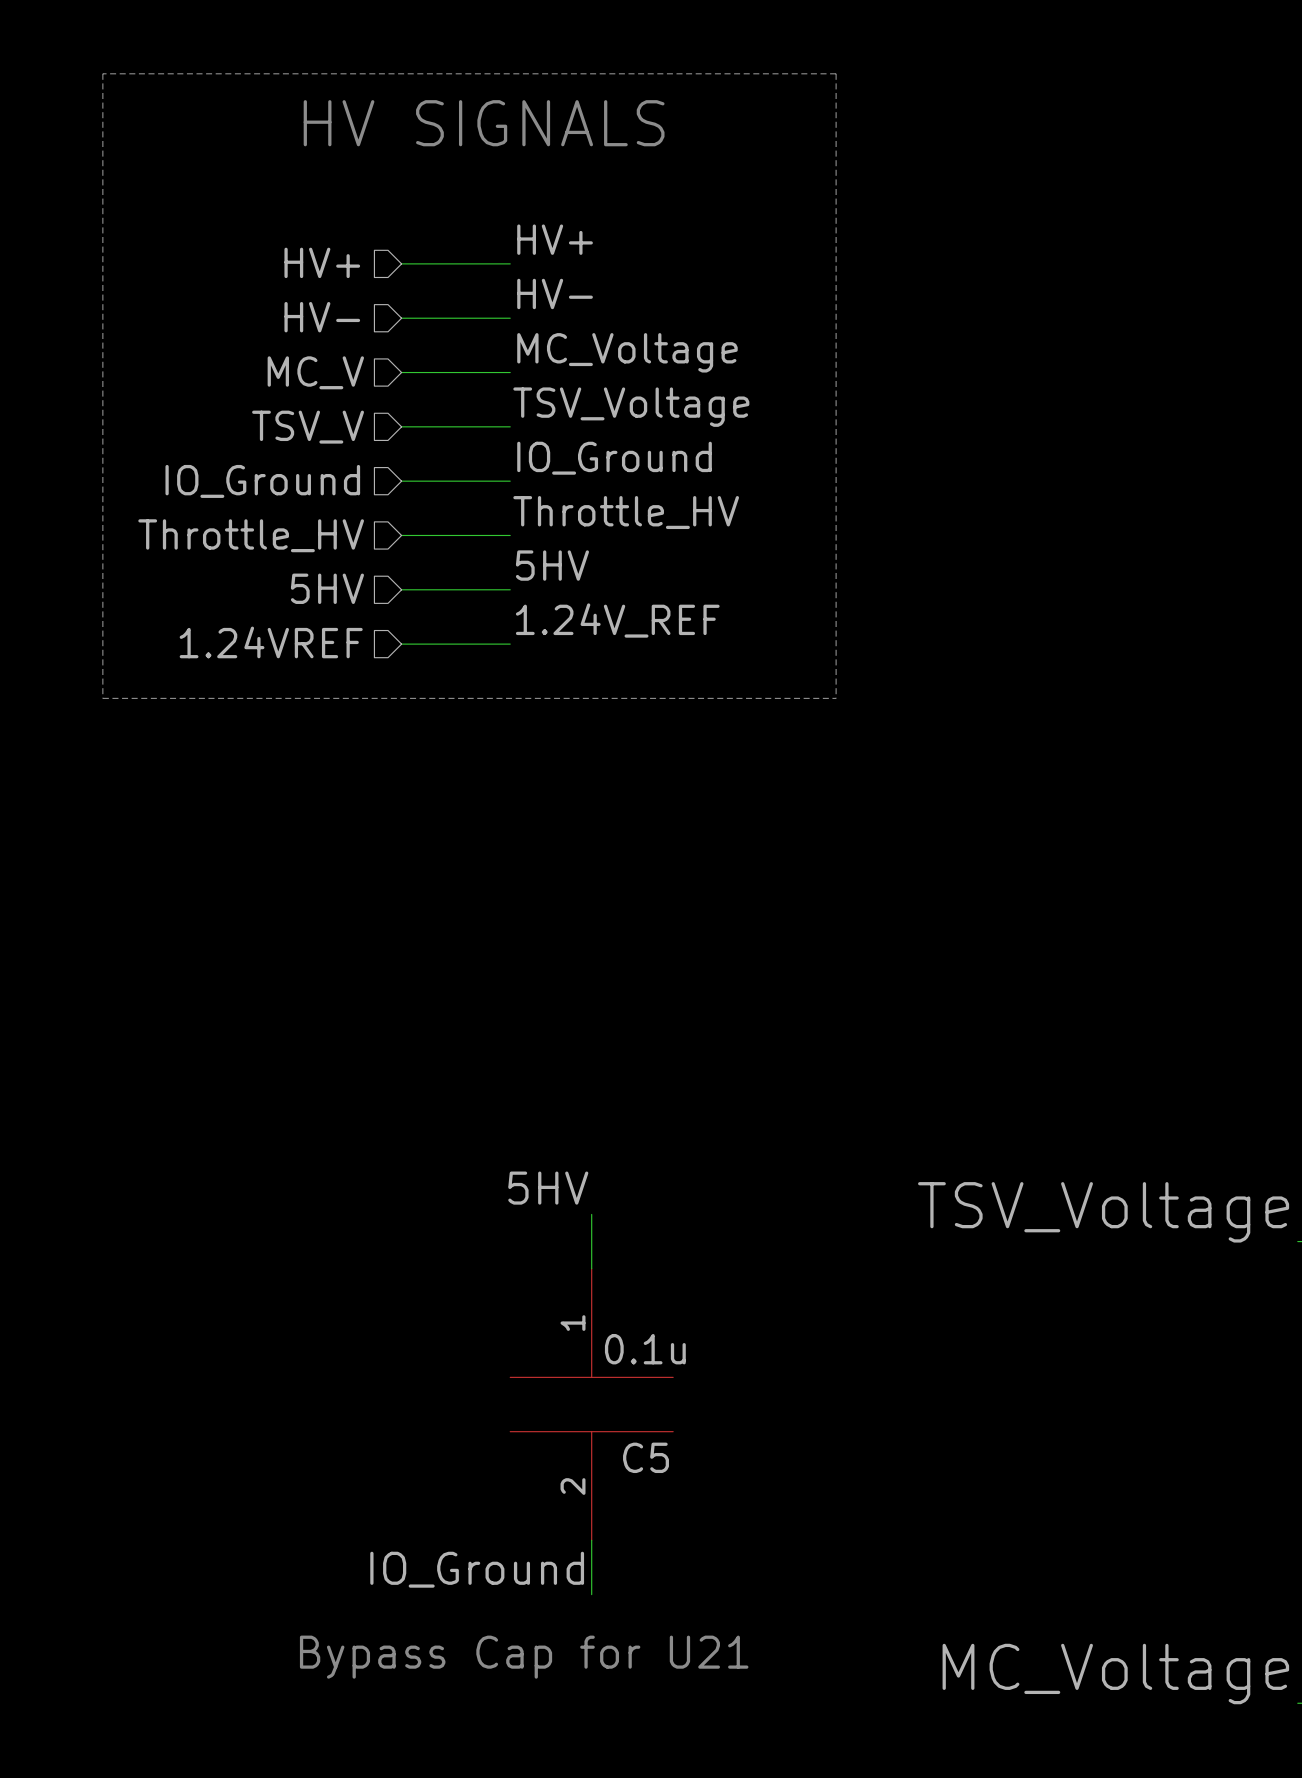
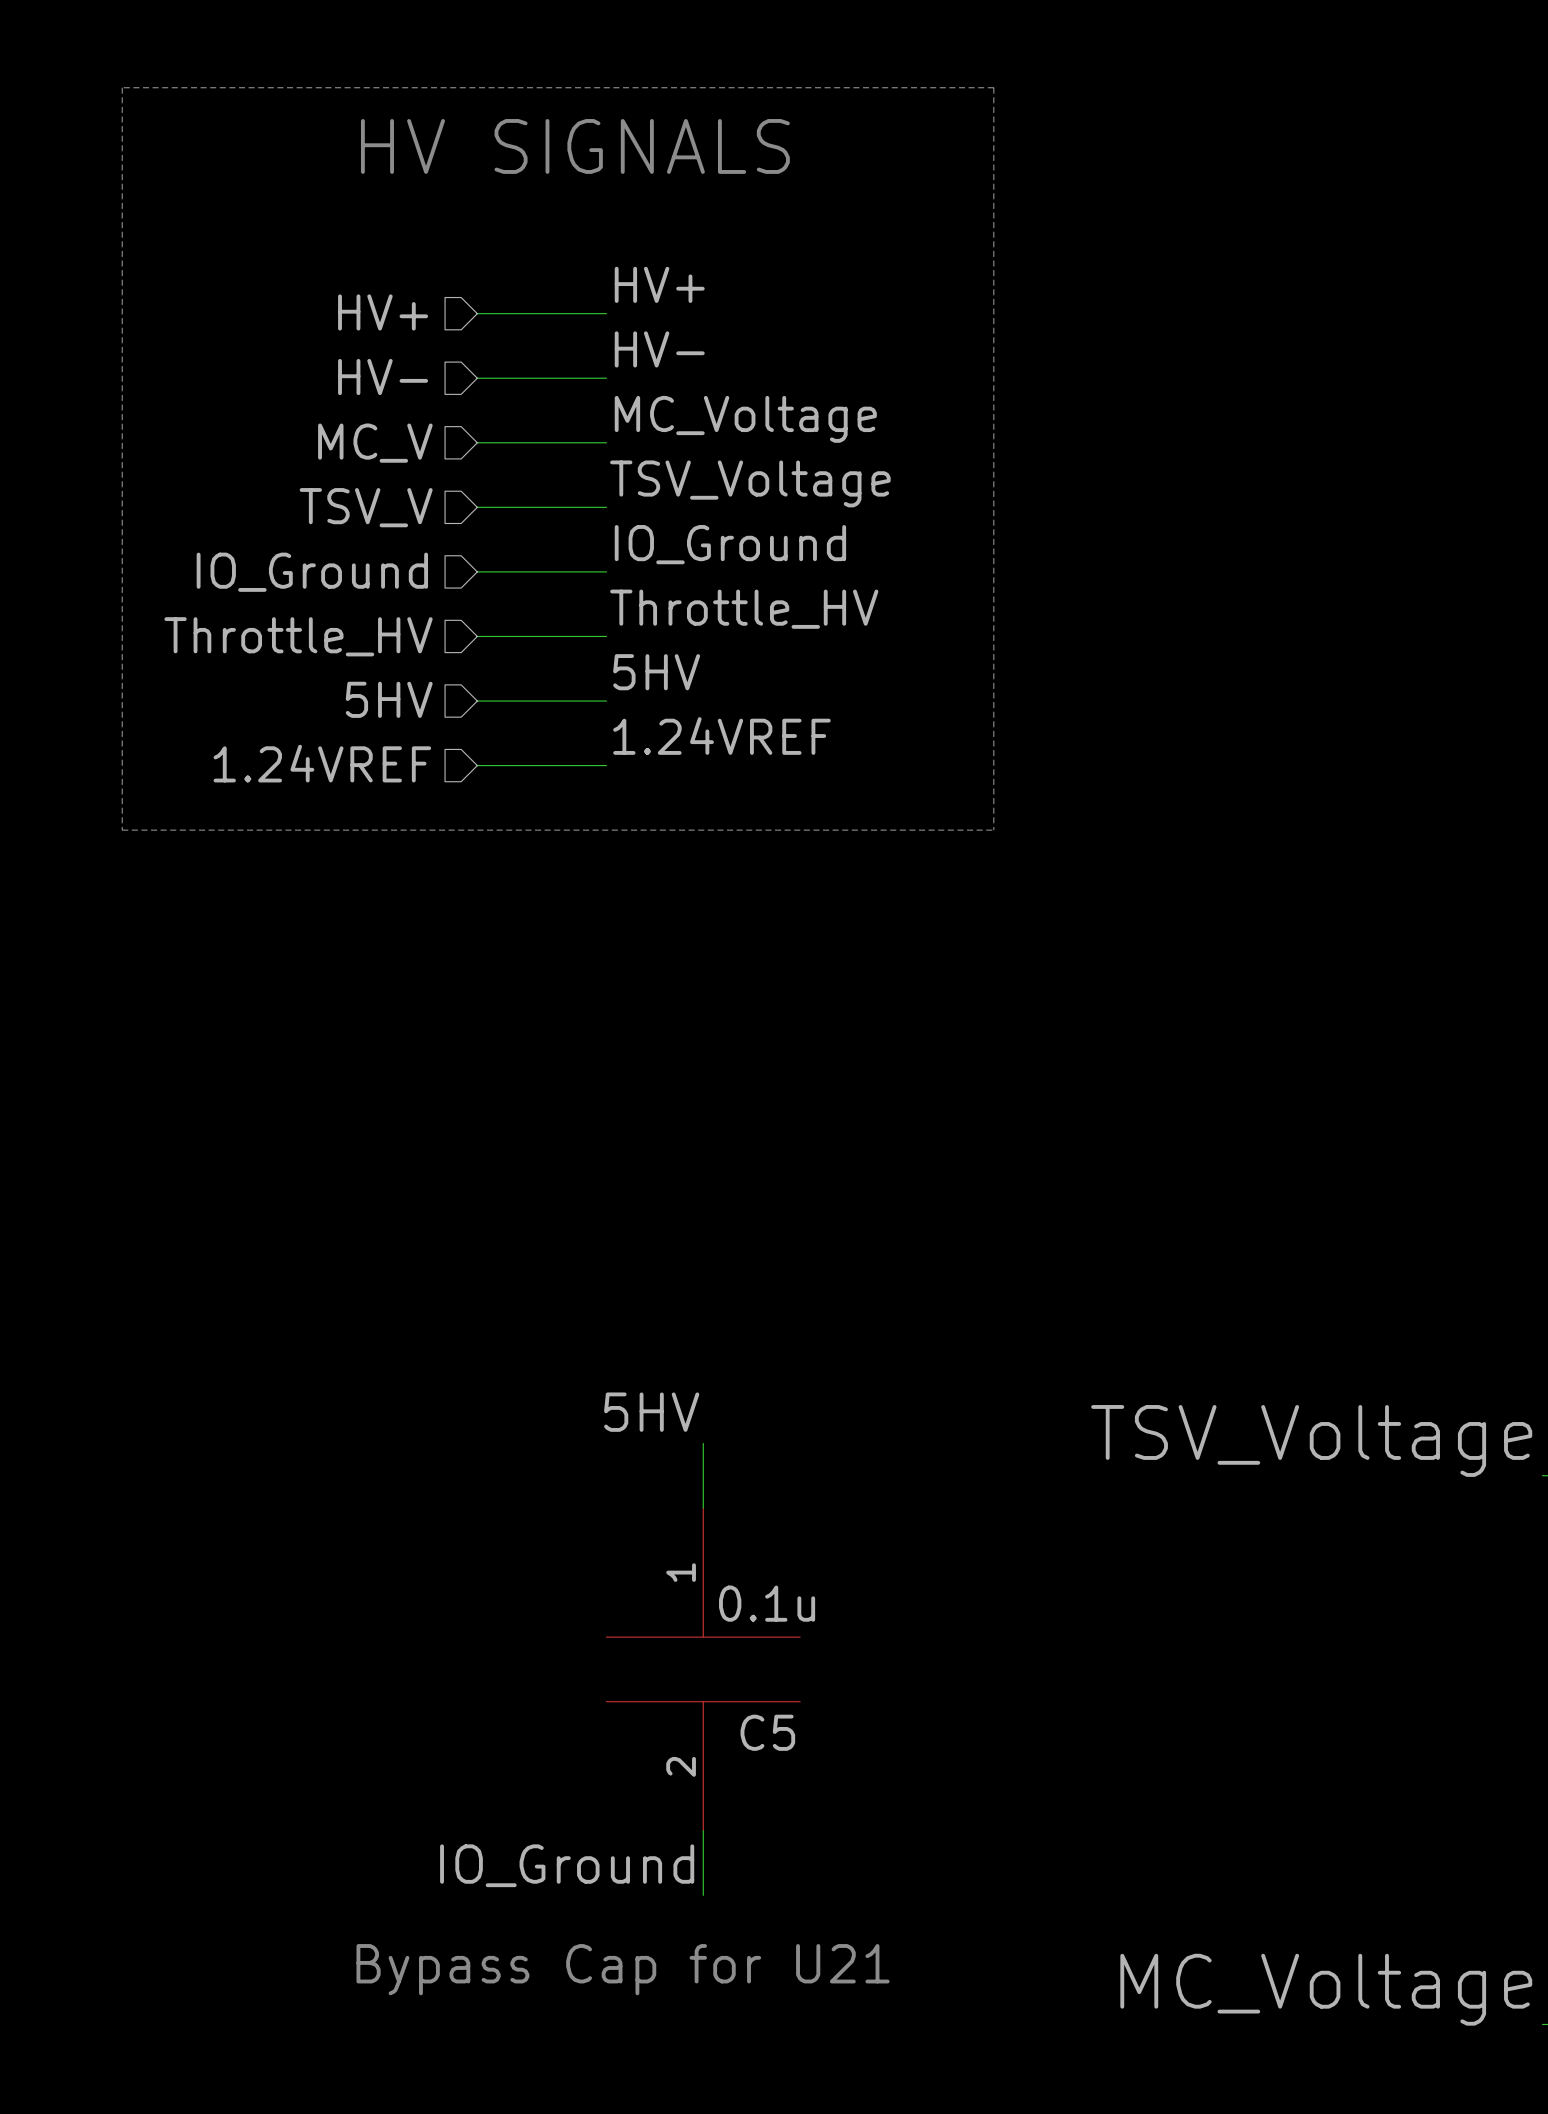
label: 1.24V_REF (617, 620) -> 1.24VREF (721, 736)

